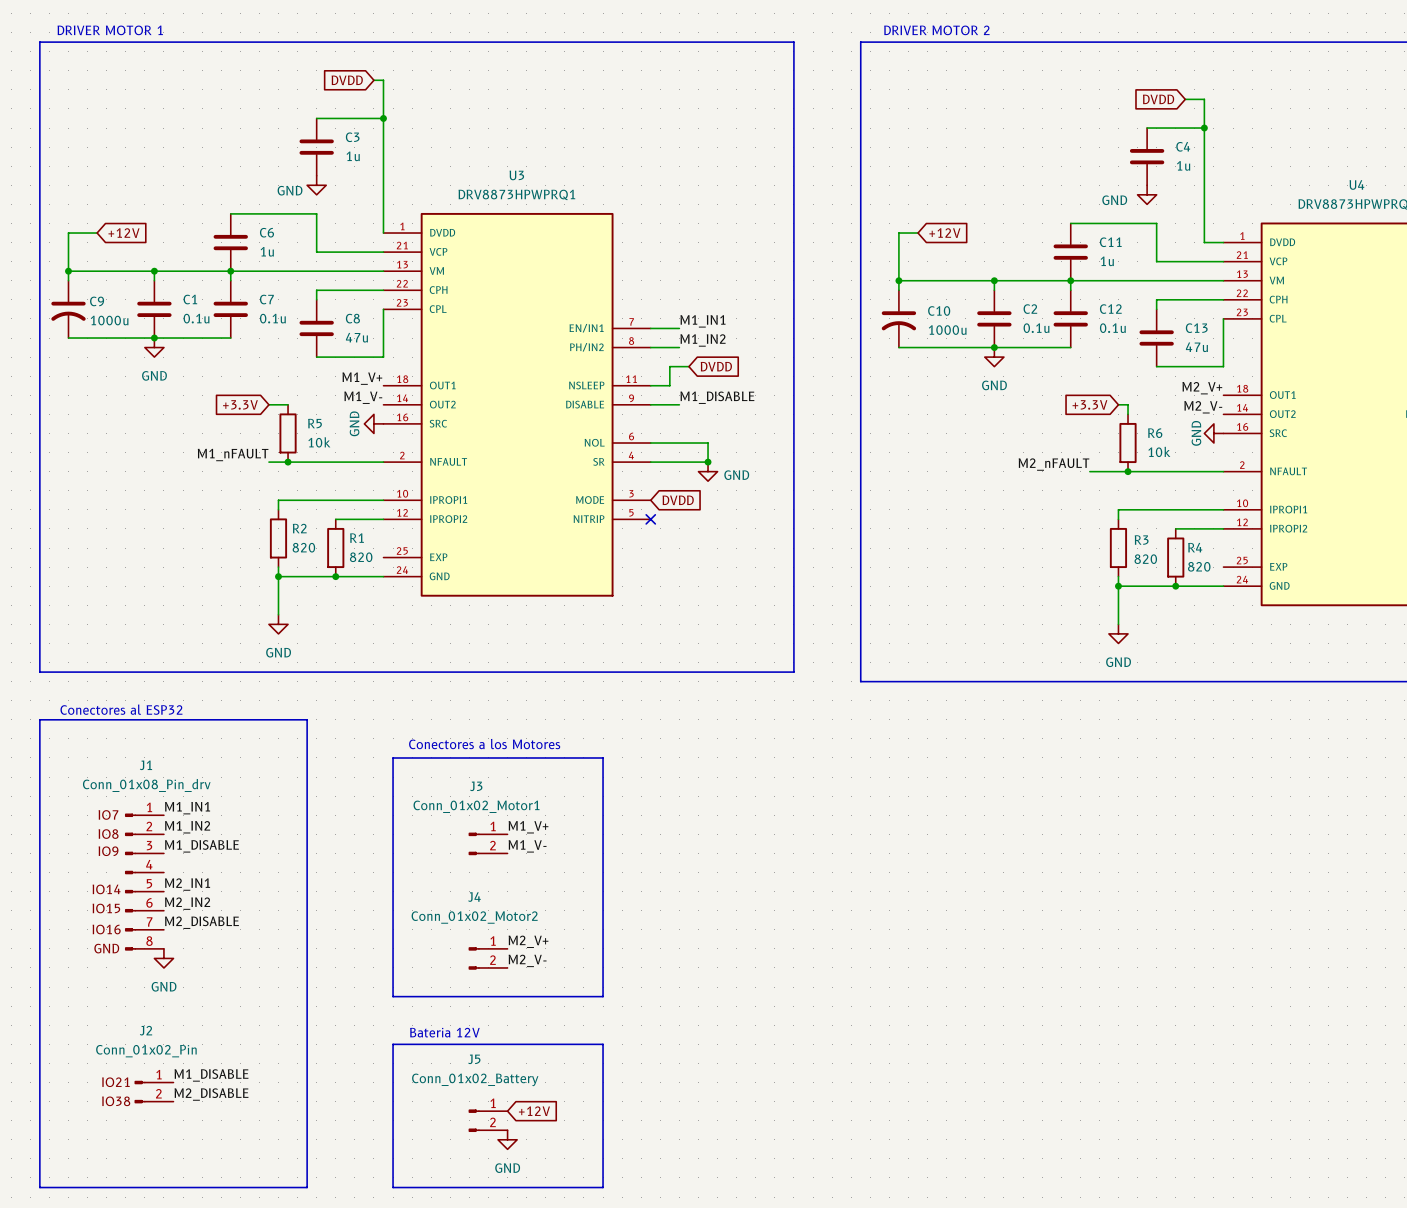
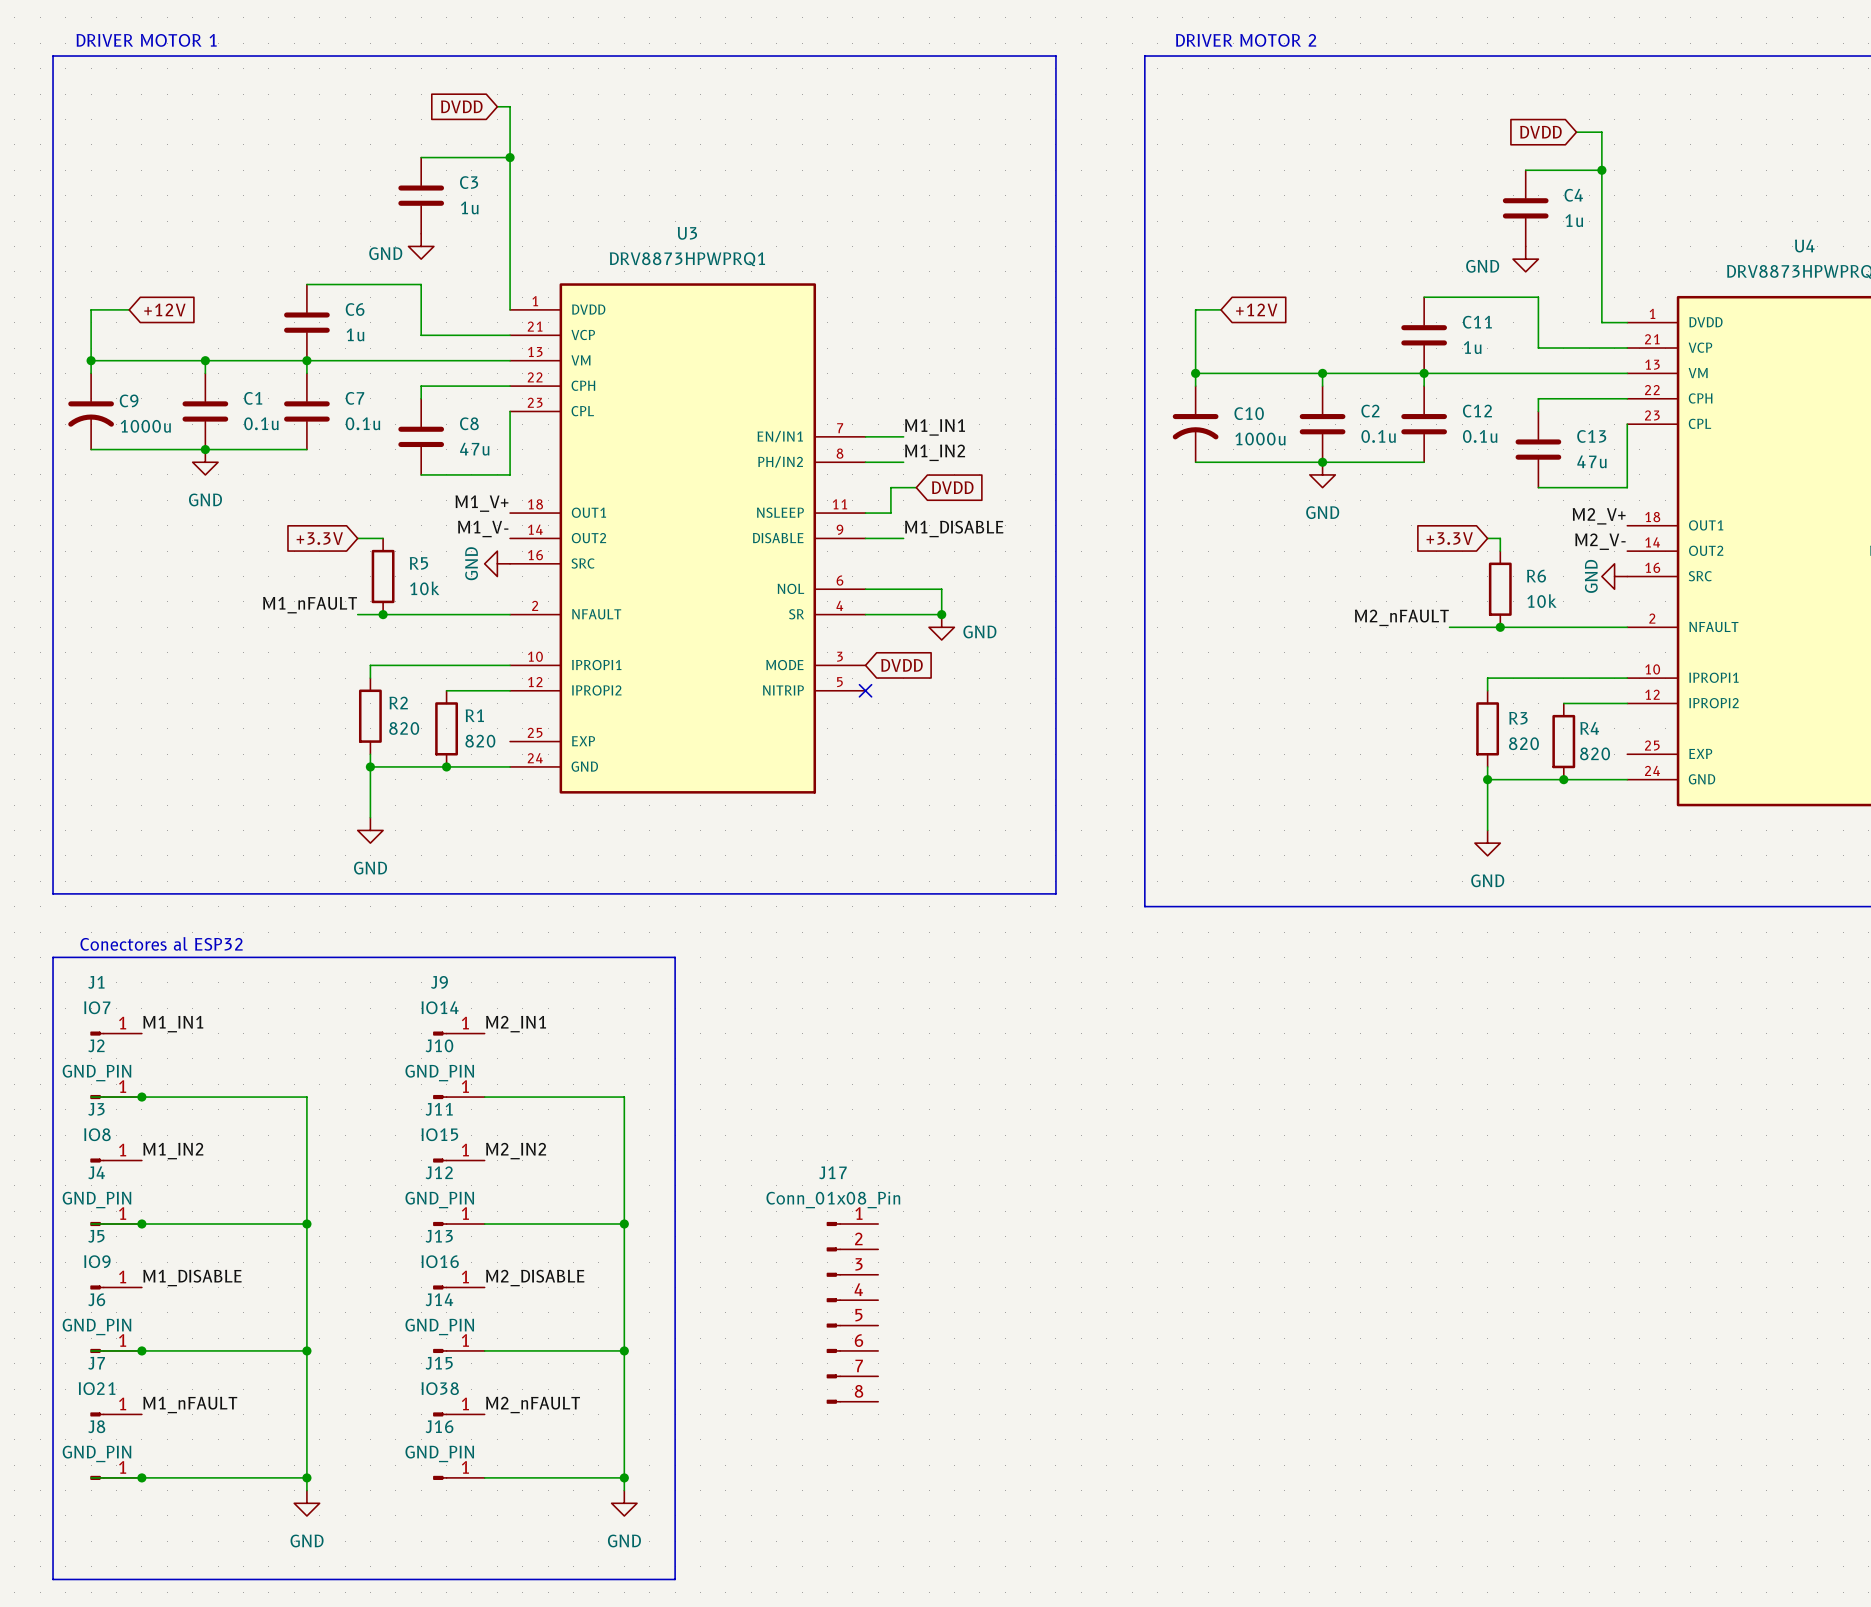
line: (307, 719) (307, 1187) -> (408, 957) (675, 957) (675, 1579)
text: Conectores a los Motores (484, 744) -> none
line: (393, 757) (393, 996) (603, 996) (603, 757) (393, 757) -> none
J1 name position: J1 (145, 765) -> J1 (96, 982)
label: none -> M2_IN1 (516, 1024)
J9: none -> IO14 (458, 1033)
J1 value: Conn_01x08_Pin_drv (146, 785) -> IO7 (97, 1007)
J3 name position: J3 (476, 786) -> J3 (96, 1109)
J3 value: Conn_01x02_Motor1 (476, 806) -> IO8 (97, 1134)
label position: M1_IN1 (187, 808) -> M1_IN1 (173, 1024)
J1 symbol: [125, 813, 164, 951] -> [90, 1031, 142, 1036]
wire: none -> (91, 1097) (306, 1097) (306, 1490)
junction: none -> (141, 1097)
J10: none -> GND_PIN (458, 1097)
wire: none -> (484, 1097) (624, 1097) (624, 1490)
label position: M1_IN2 (187, 827) -> M1_IN2 (173, 1151)
label: M1_V+ (528, 827) -> none
J3 symbol: [468, 832, 508, 855] -> [90, 1158, 142, 1163]
label: M1_DISABLE (201, 846) -> none
label: M1_V- (527, 846) -> none
label: none -> M2_IN2 (516, 1151)
J11: none -> IO15 (458, 1160)
label: M2_IN1 (187, 884) -> none
J4 name position: J4 (474, 897) -> J4 (96, 1172)
label: M2_IN2 (187, 903) -> none
J4 value: Conn_01x02_Motor2 (474, 917) -> GND_PIN (96, 1200)
wire: none -> (91, 1224) (306, 1224)
junction: none -> (141, 1224)
junction: none -> (306, 1224)
J12: none -> GND_PIN (458, 1224)
wire: none -> (484, 1224) (624, 1224)
junction: none -> (624, 1224)
label: M2_DISABLE (201, 922) -> none
label: M2_V+ (528, 941) -> none
J4 symbol: [468, 947, 508, 970] -> [90, 1221, 142, 1227]
power symbol: GND (163, 958) -> none
label: none -> M1_DISABLE (192, 1278)
label: none -> M2_DISABLE (535, 1278)
label: M2_V- (527, 960) -> none
J13: none -> IO16 (458, 1287)
J17: none -> Conn_01x08_Pin (852, 1312)
wire: none -> (91, 1350) (306, 1350)
J6: none -> GND_PIN (116, 1350)
junction: none -> (141, 1350)
junction: none -> (306, 1350)
J14: none -> GND_PIN (458, 1350)
wire: none -> (484, 1350) (624, 1350)
junction: none -> (624, 1350)
J2 name position: J2 (146, 1030) -> J2 (96, 1045)
text: Bateria 12V (444, 1032) -> none
J2 value: Conn_01x02_Pin (146, 1051) -> GND_PIN (96, 1073)
label: none -> M1_nFAULT (190, 1405)
label: none -> M2_nFAULT (533, 1405)
J5 name position: J5 (474, 1059) -> J5 (96, 1236)
J7: none -> IO21 (116, 1414)
J15: none -> IO38 (458, 1414)
label: M1_DISABLE (211, 1075) -> none
J5 value: Conn_01x02_Battery (475, 1079) -> IO9 (97, 1261)
J2 symbol: [134, 1081, 174, 1104] -> [90, 1095, 142, 1100]
label: M2_DISABLE (211, 1094) -> none
J5 symbol: [468, 1109, 508, 1132] -> [90, 1285, 142, 1290]
wire: none -> (91, 1477) (306, 1477)
J8: none -> GND_PIN (116, 1477)
junction: none -> (141, 1477)
junction: none -> (306, 1477)
J16: none -> GND_PIN (458, 1477)
wire: none -> (484, 1477) (624, 1477)
junction: none -> (624, 1477)
global label: +12V (534, 1111) -> none
power symbol: none -> GND (306, 1503)
power symbol position: GND (507, 1139) -> GND (624, 1503)
line: (393, 1187) (393, 1044) (603, 1044) (603, 1187) (507, 1187) -> (522, 1579) (408, 1579)

